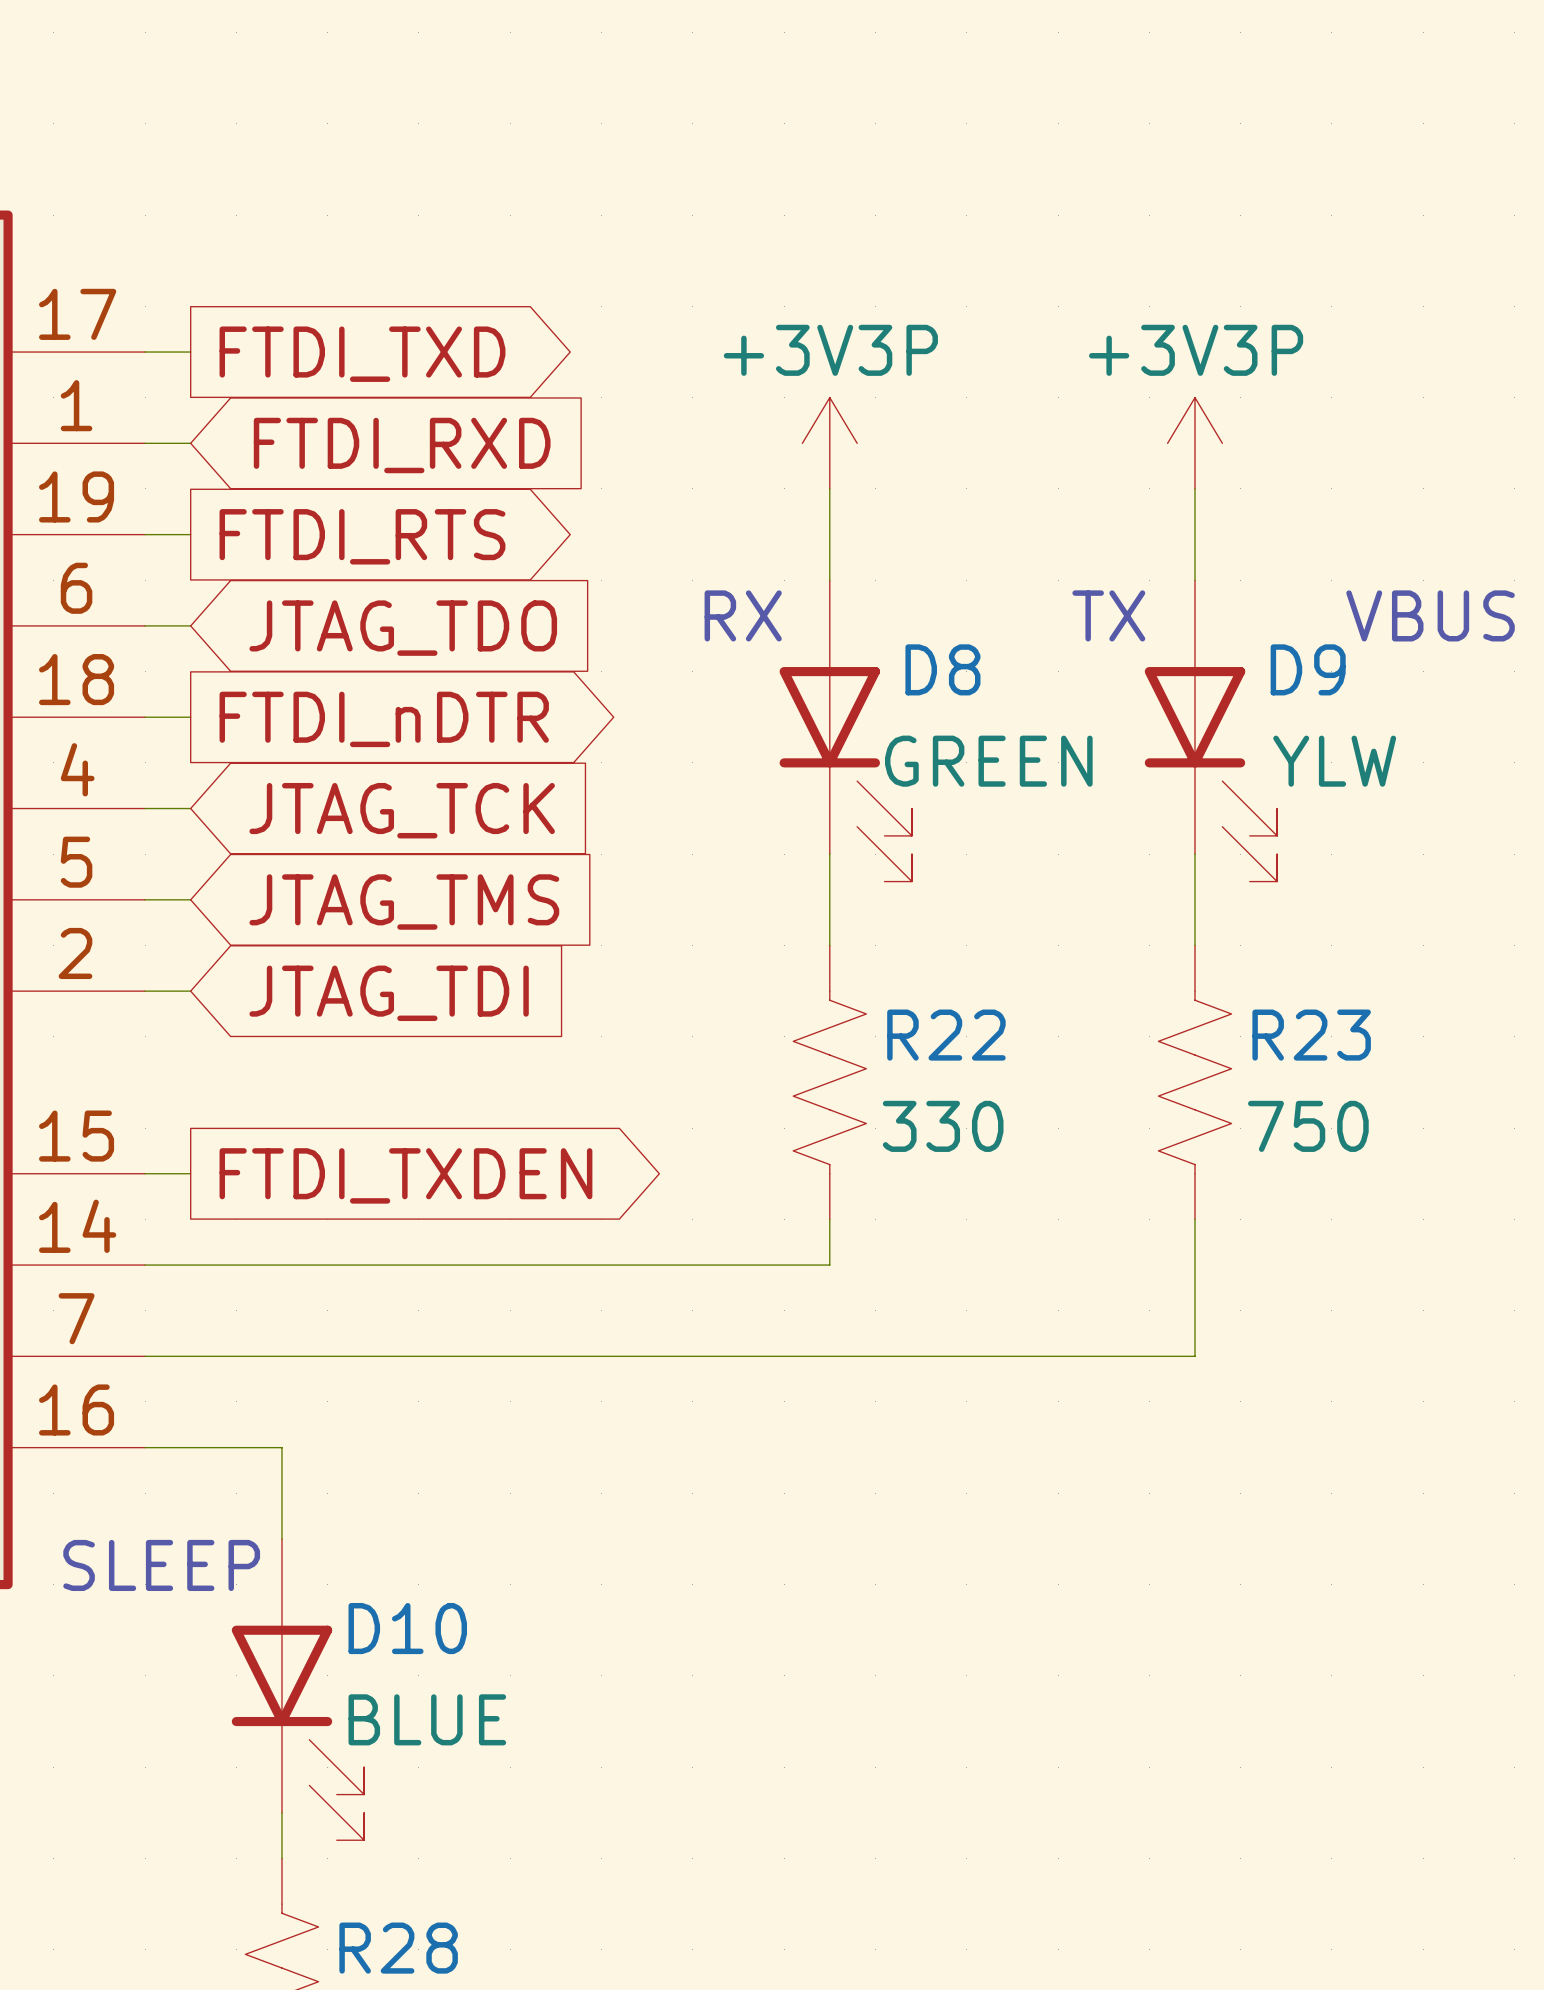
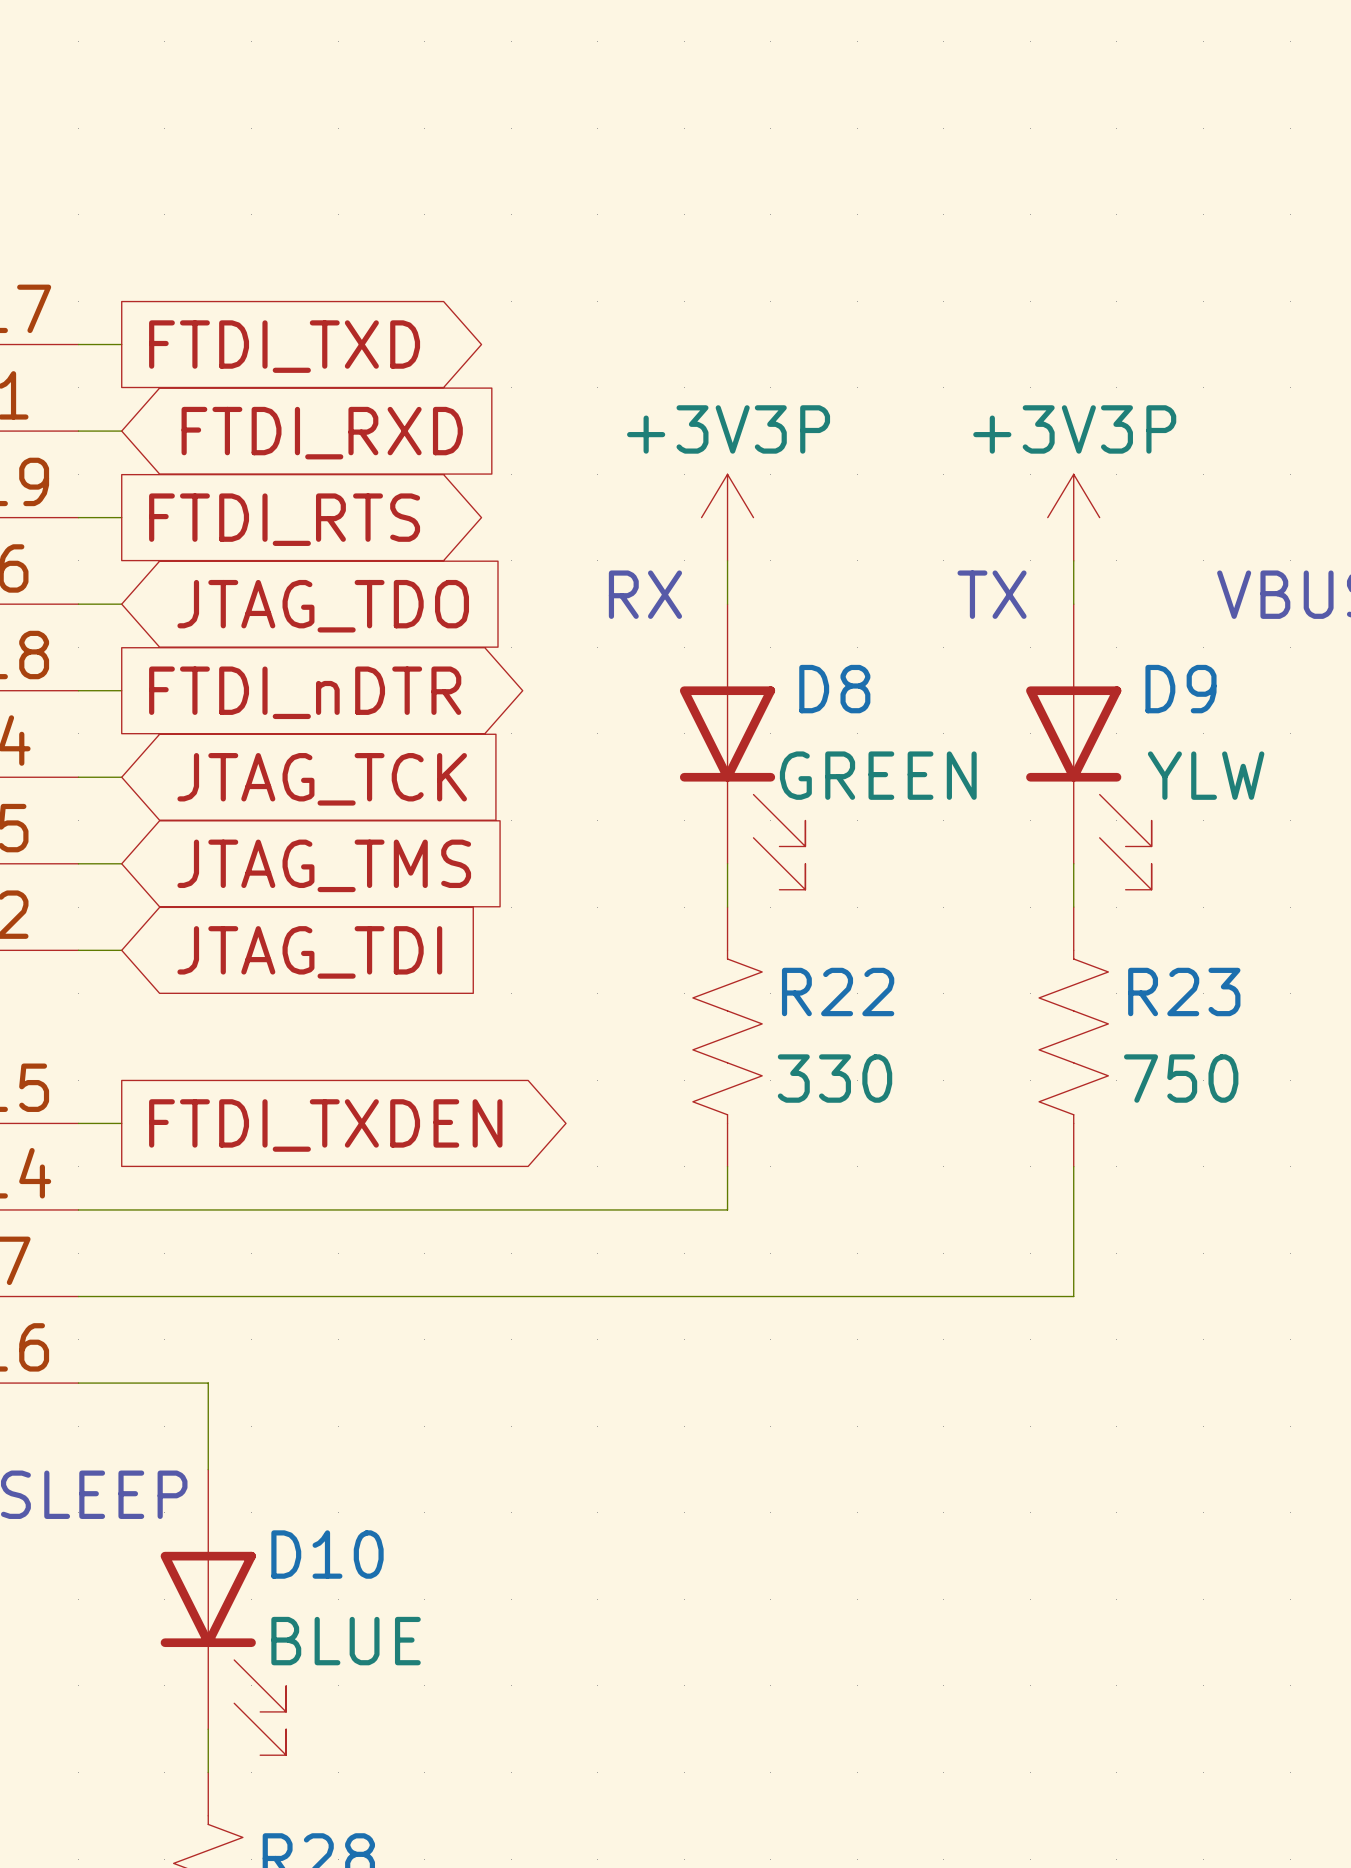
power symbol position: +3V3P (829, 443) -> +3V3P (727, 517)
power symbol position: +3V3P (1194, 443) -> +3V3P (1073, 517)
D8 position: (845, 730) -> (742, 746)
D9 position: (1210, 730) -> (1088, 746)

